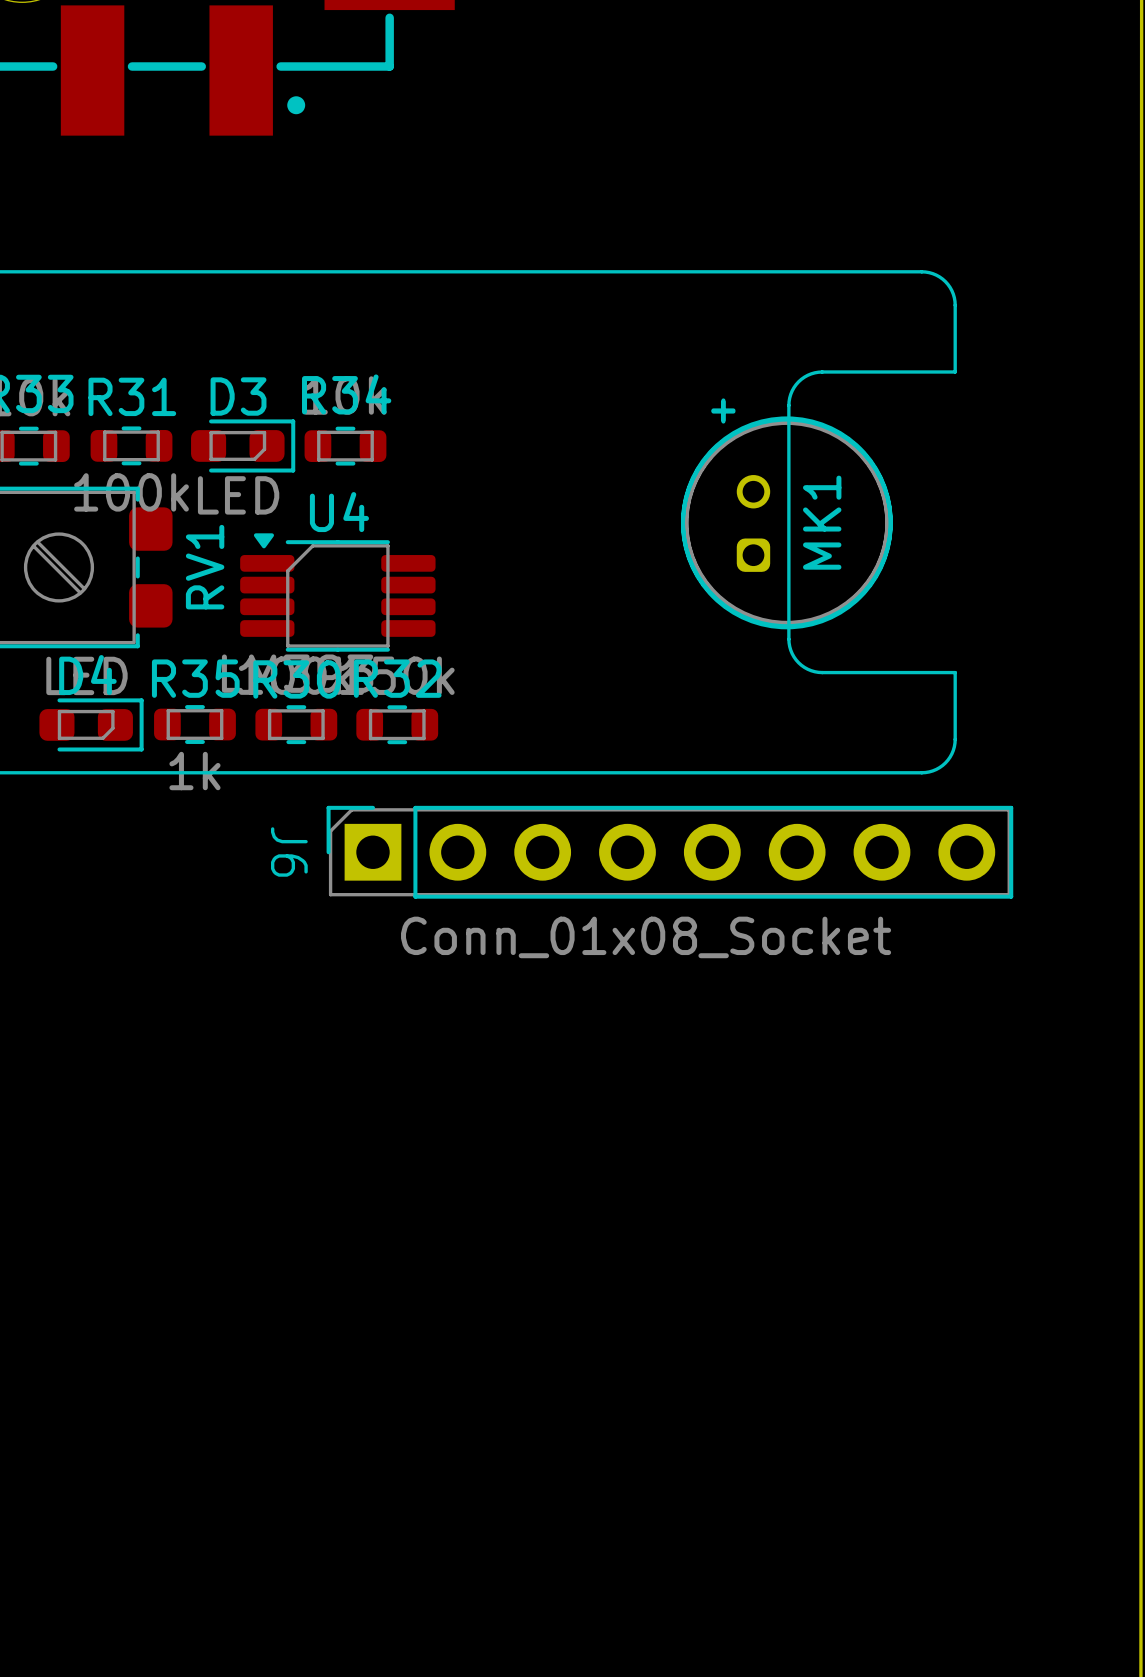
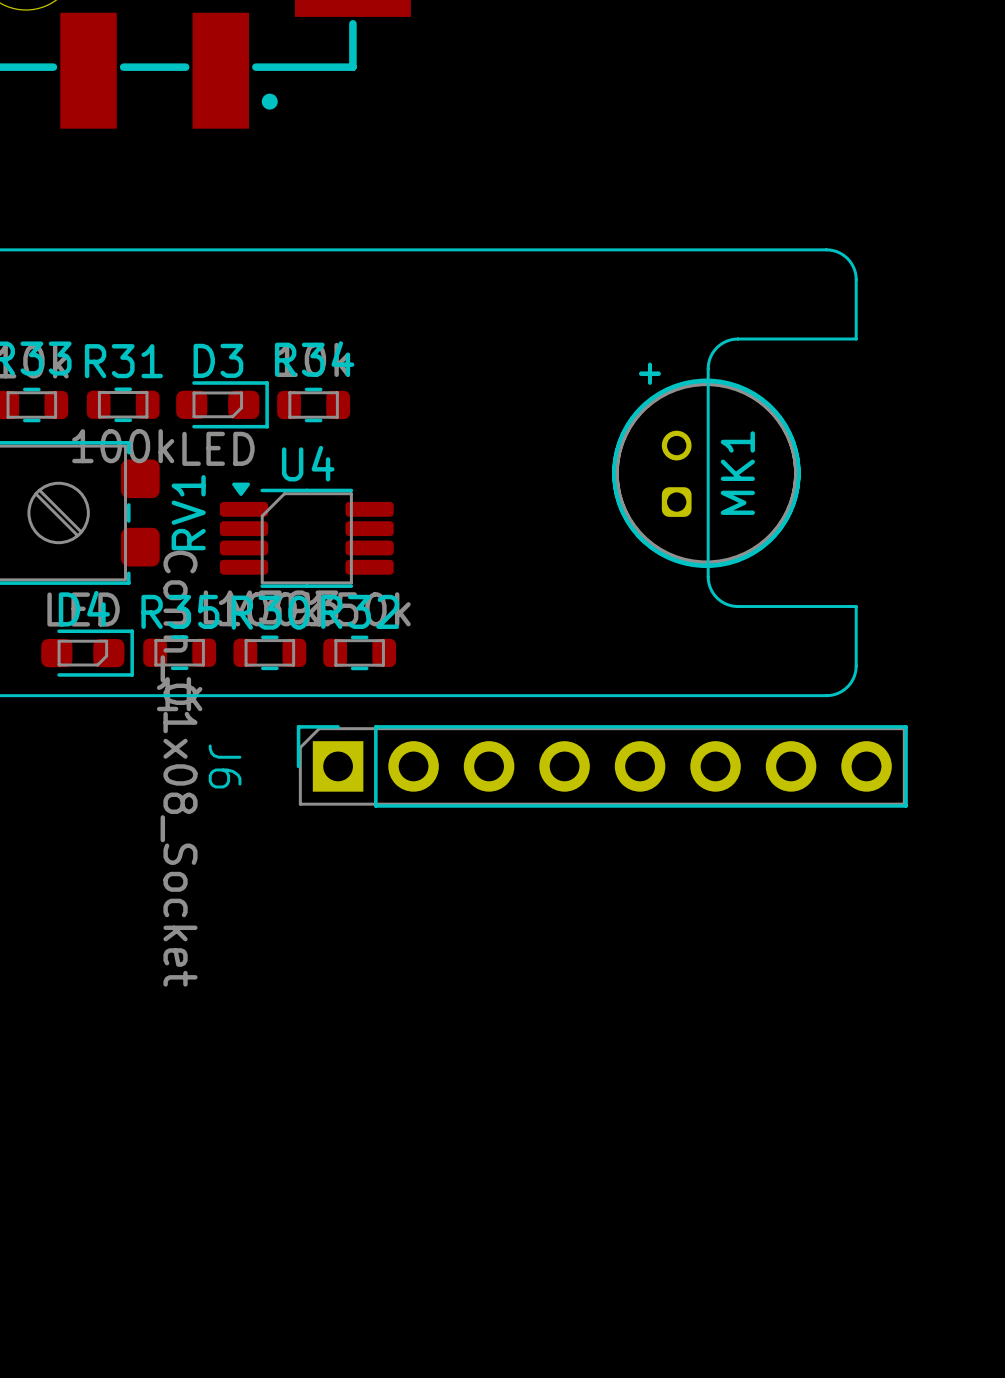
J6 name position: J6 (289, 851) -> J6 (225, 766)
J6 value rotation: 0° (646, 937) -> 90° clockwise (179, 768)

